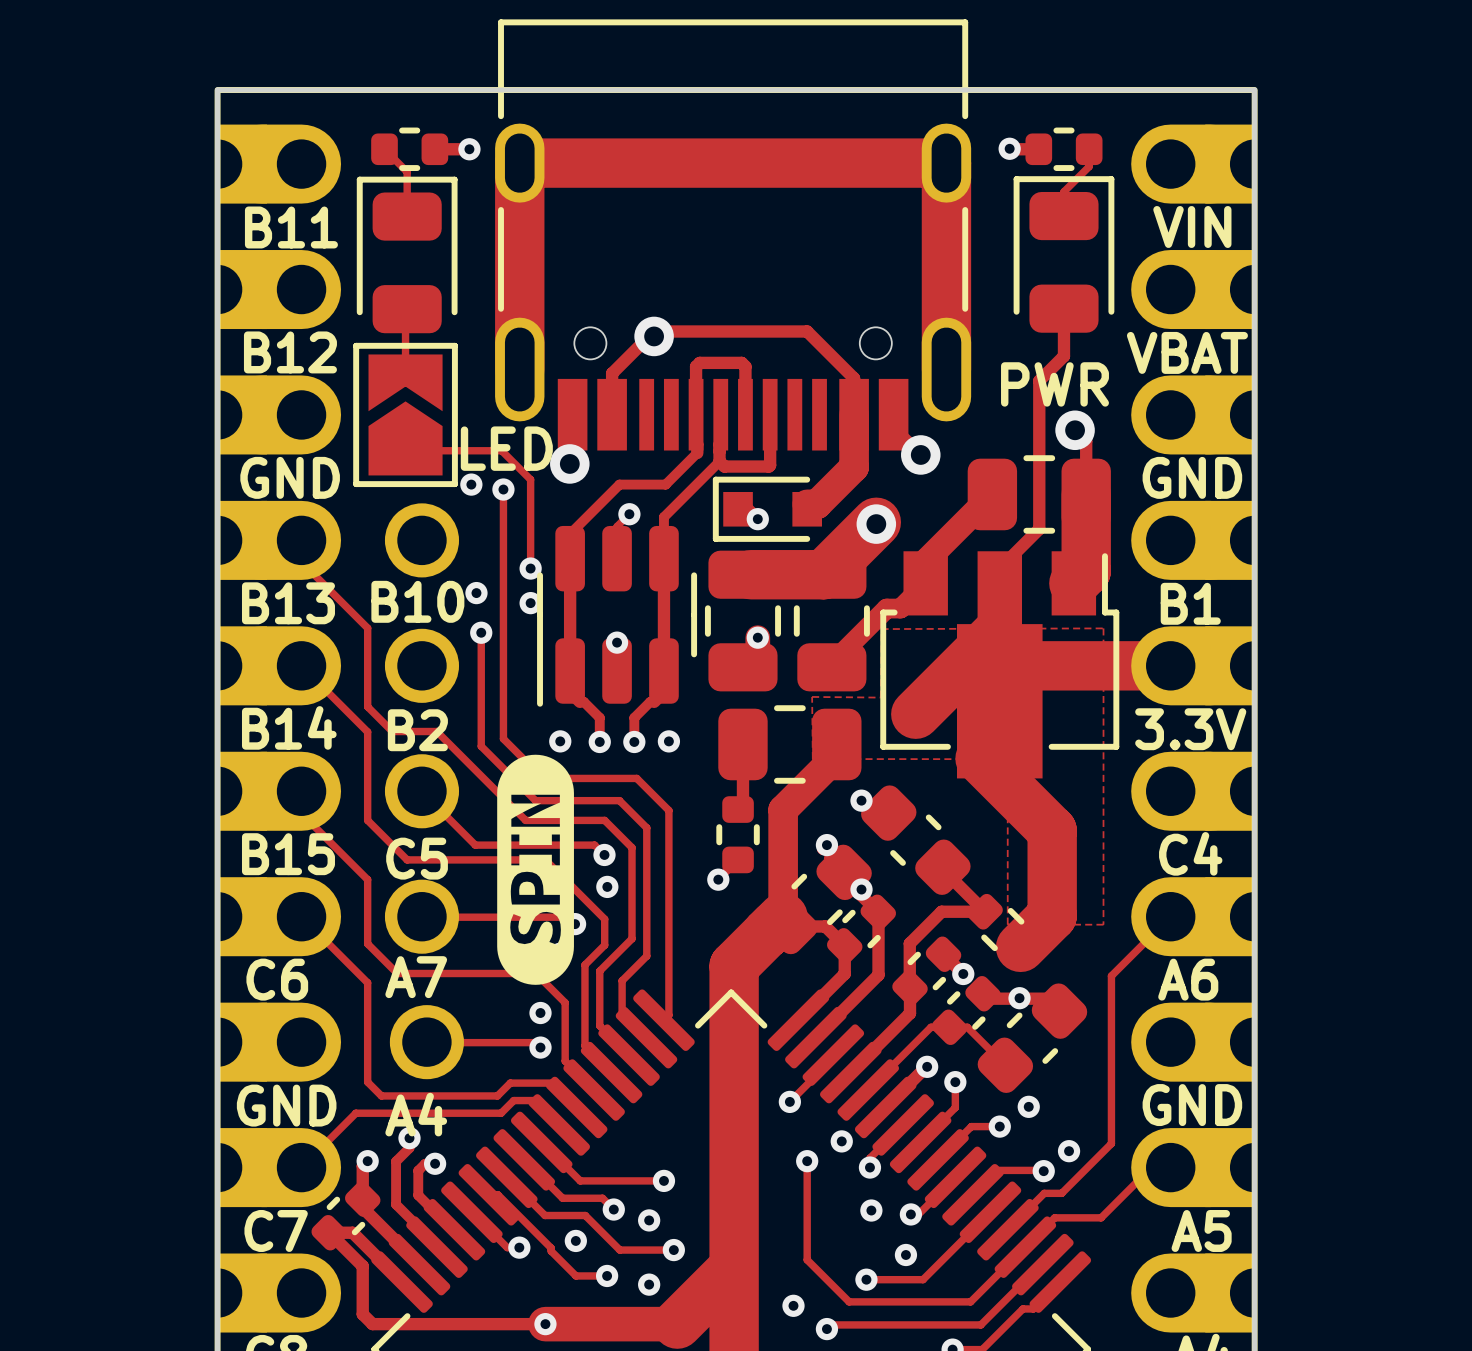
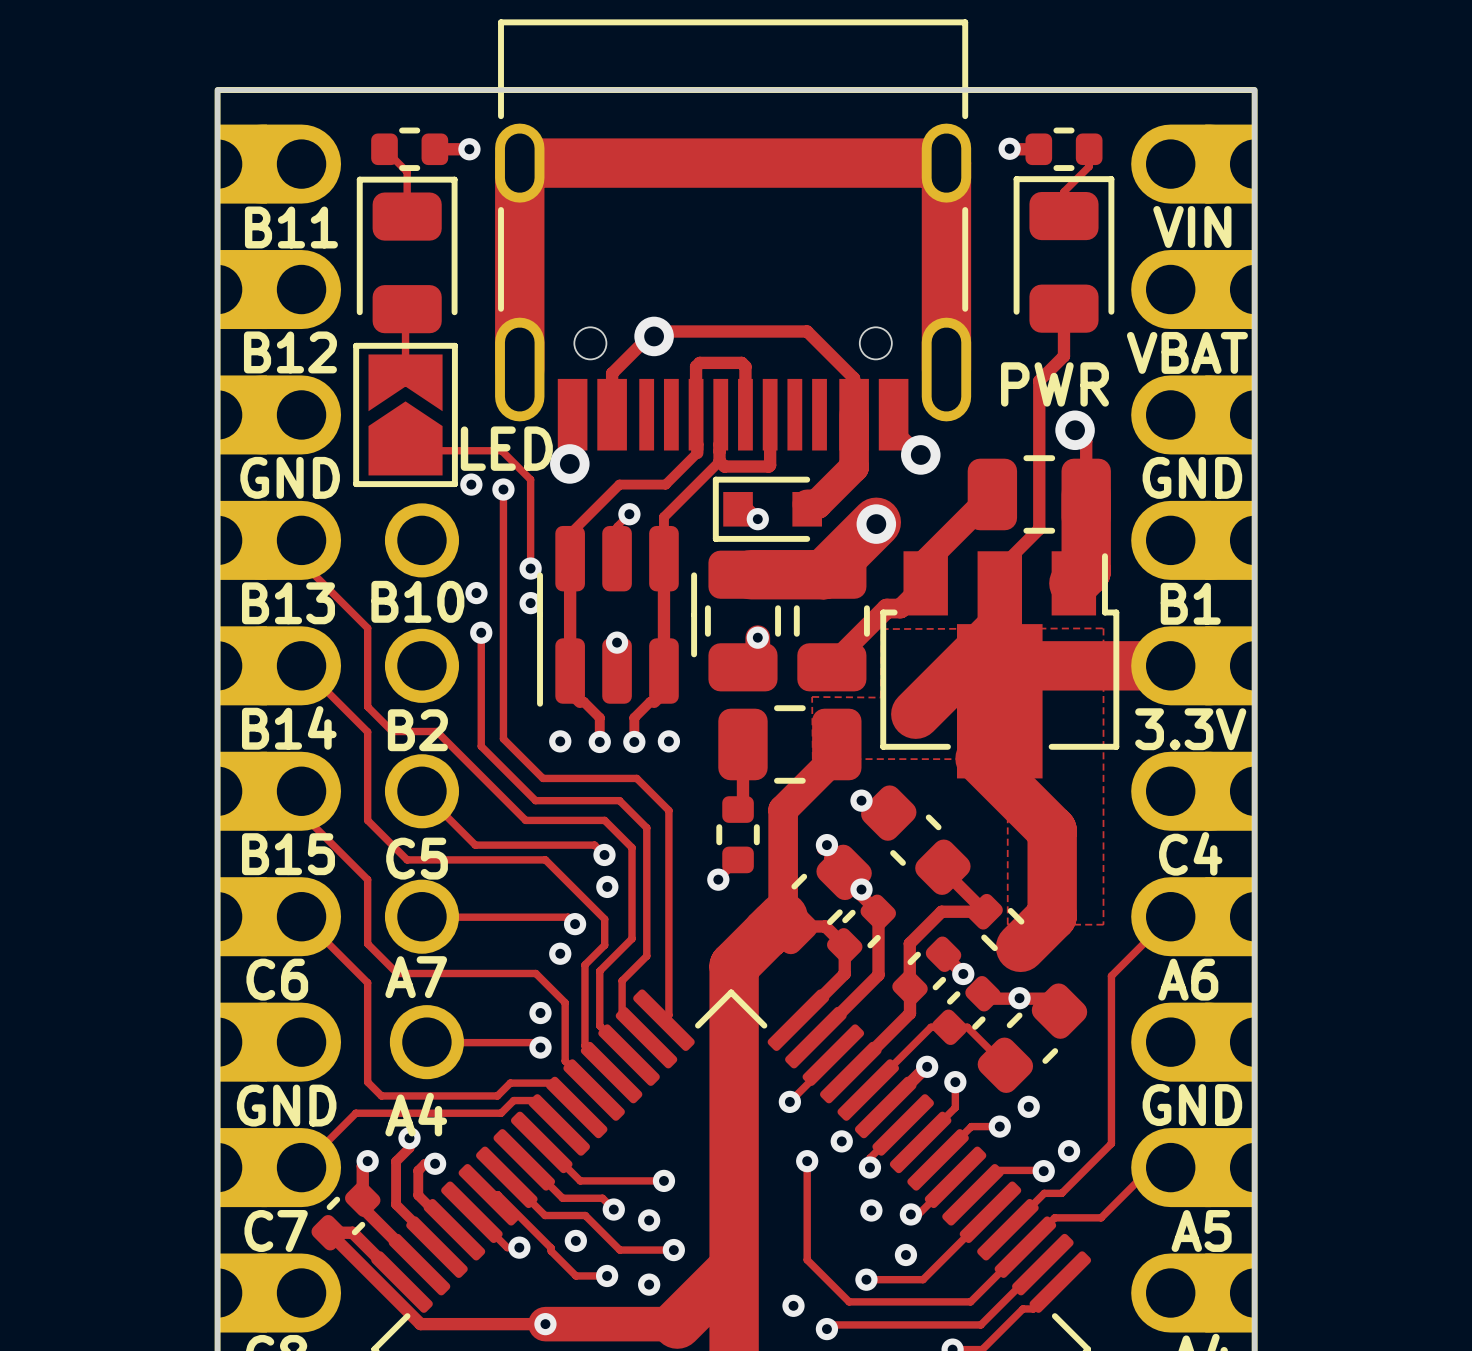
drawing: [497, 754, 574, 985] -> none
track: (362, 1266) (362, 1314) (372, 1324) (420, 1324) -> (362, 1266) (420, 1324)

